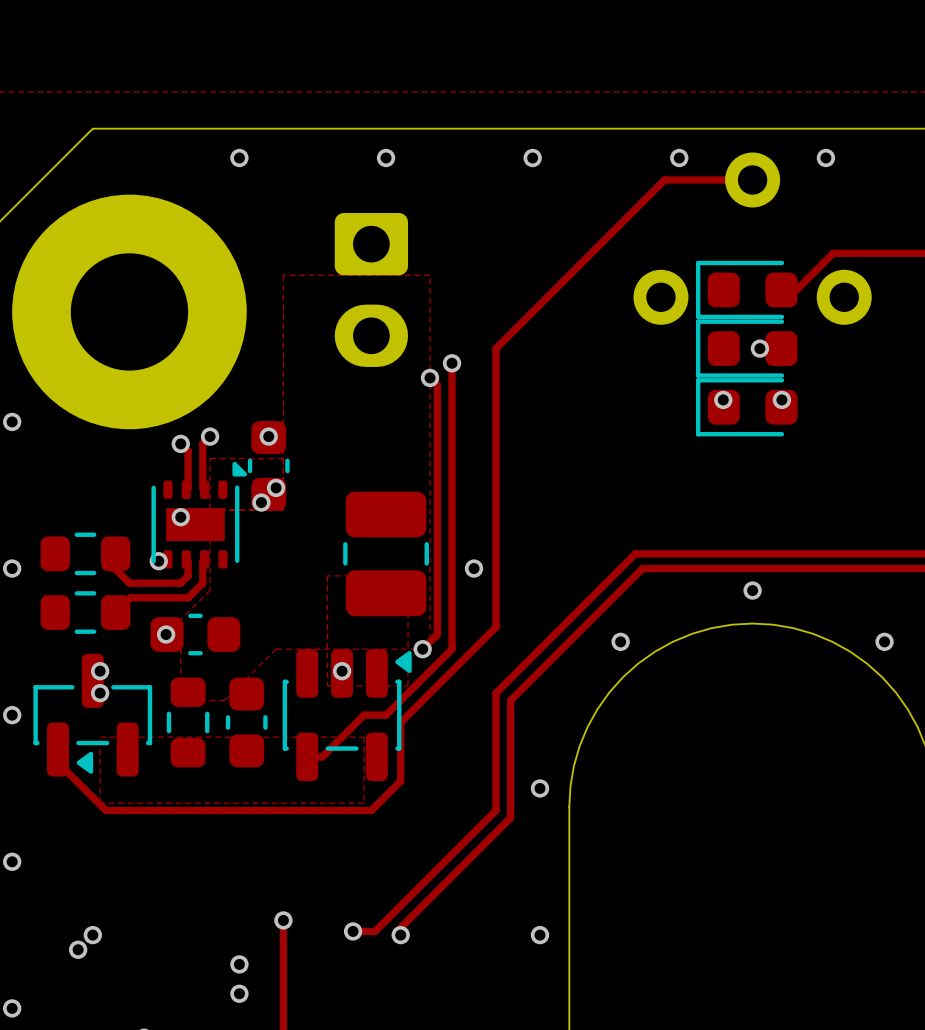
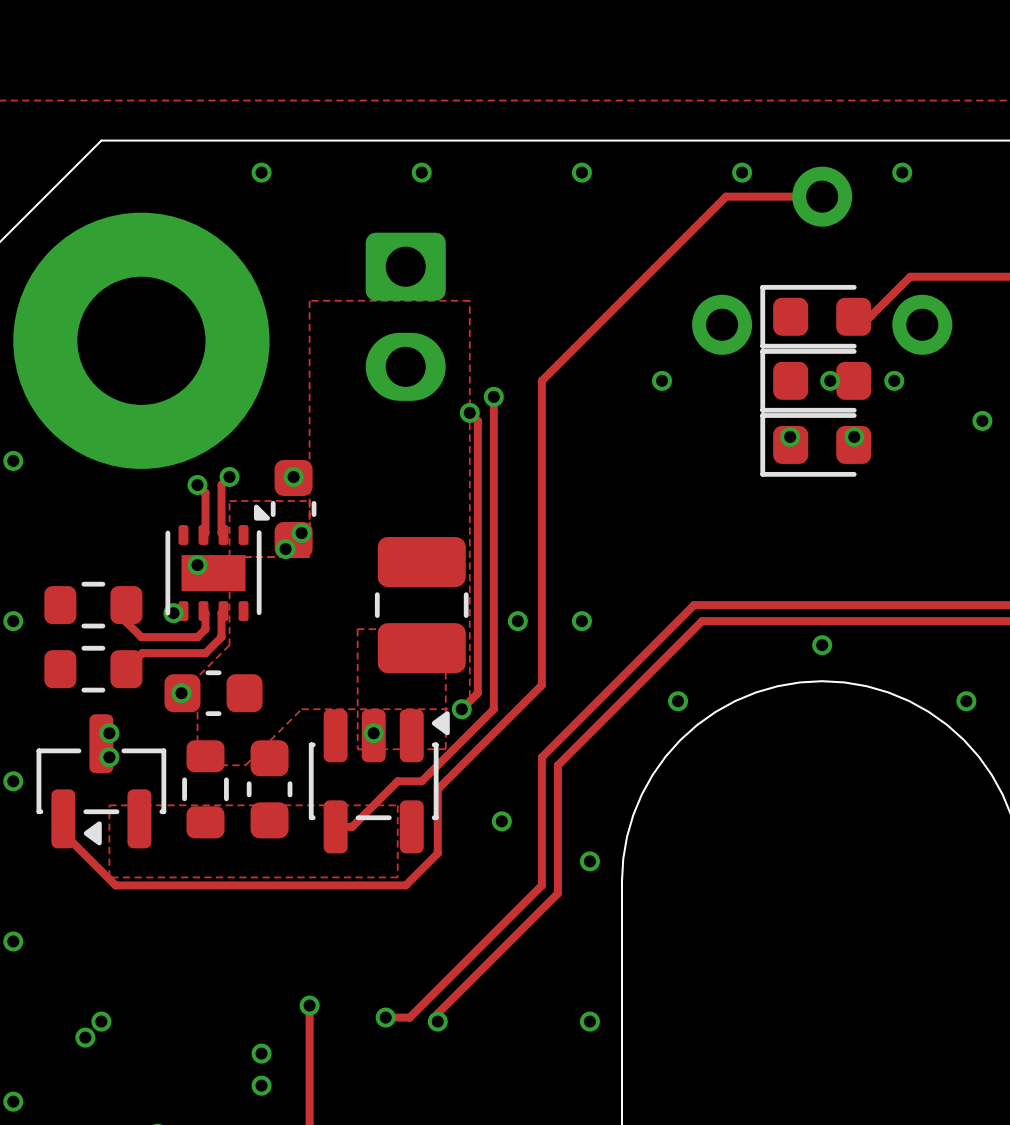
via: none -> (662, 380)
via: none -> (894, 380)
via: none -> (982, 420)
via: none -> (581, 621)
via: none -> (501, 821)

